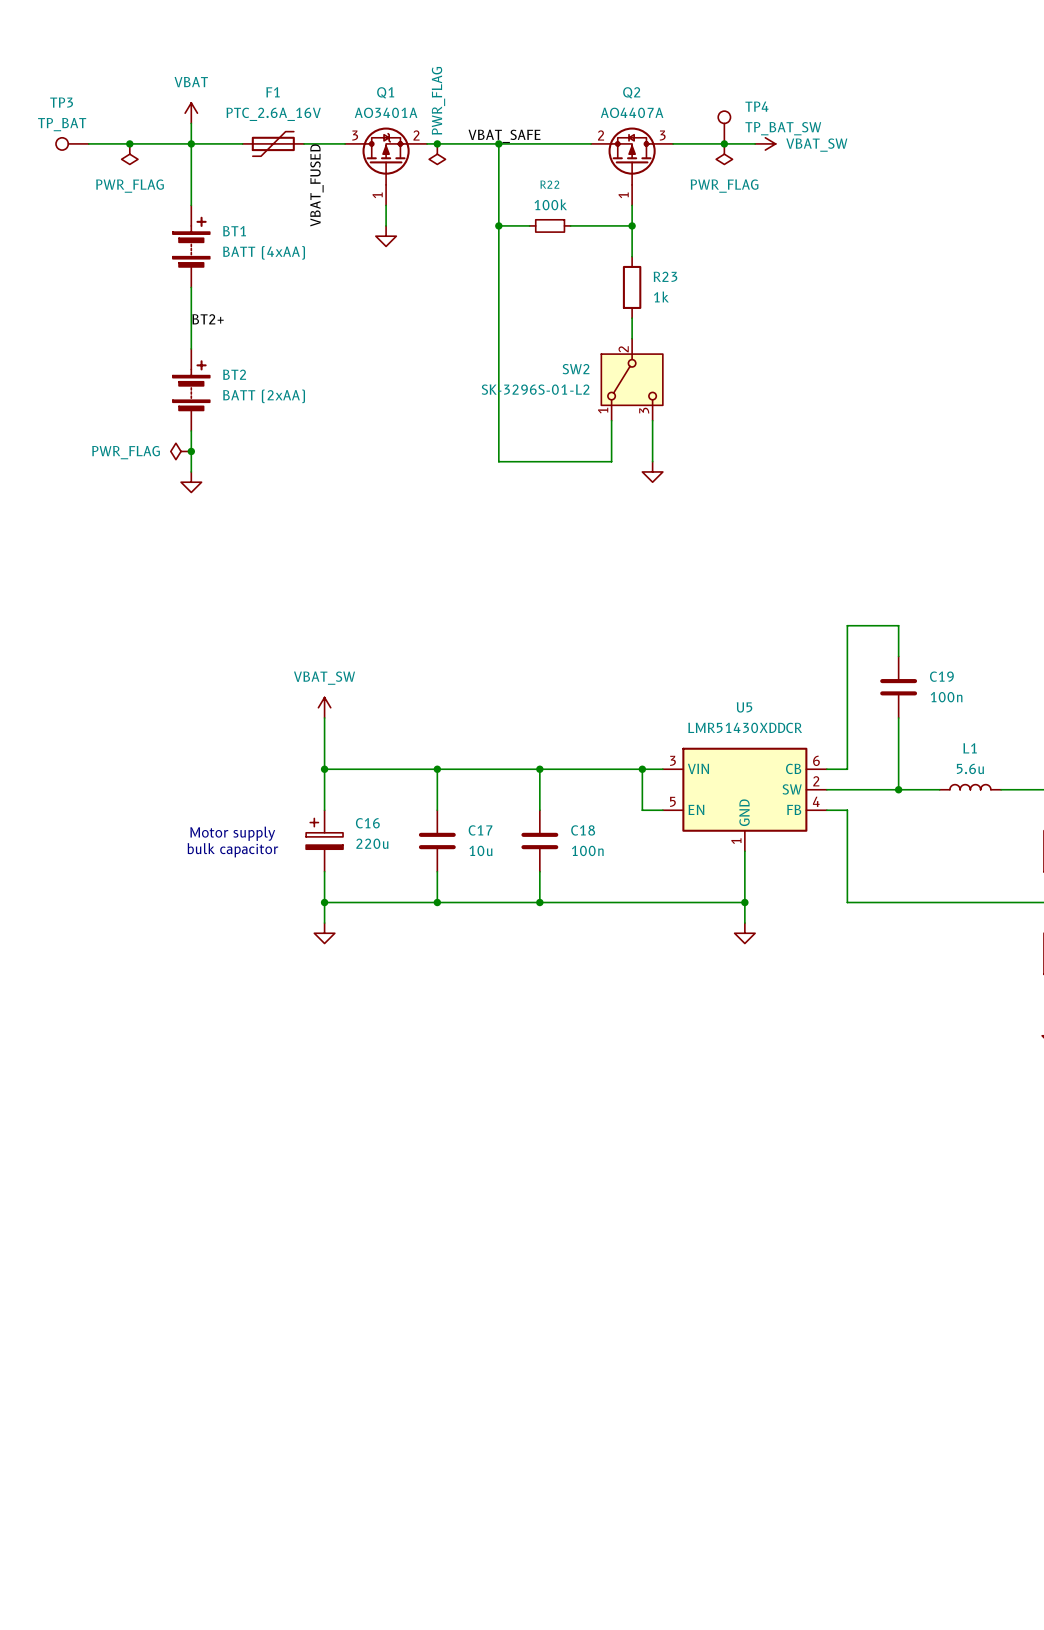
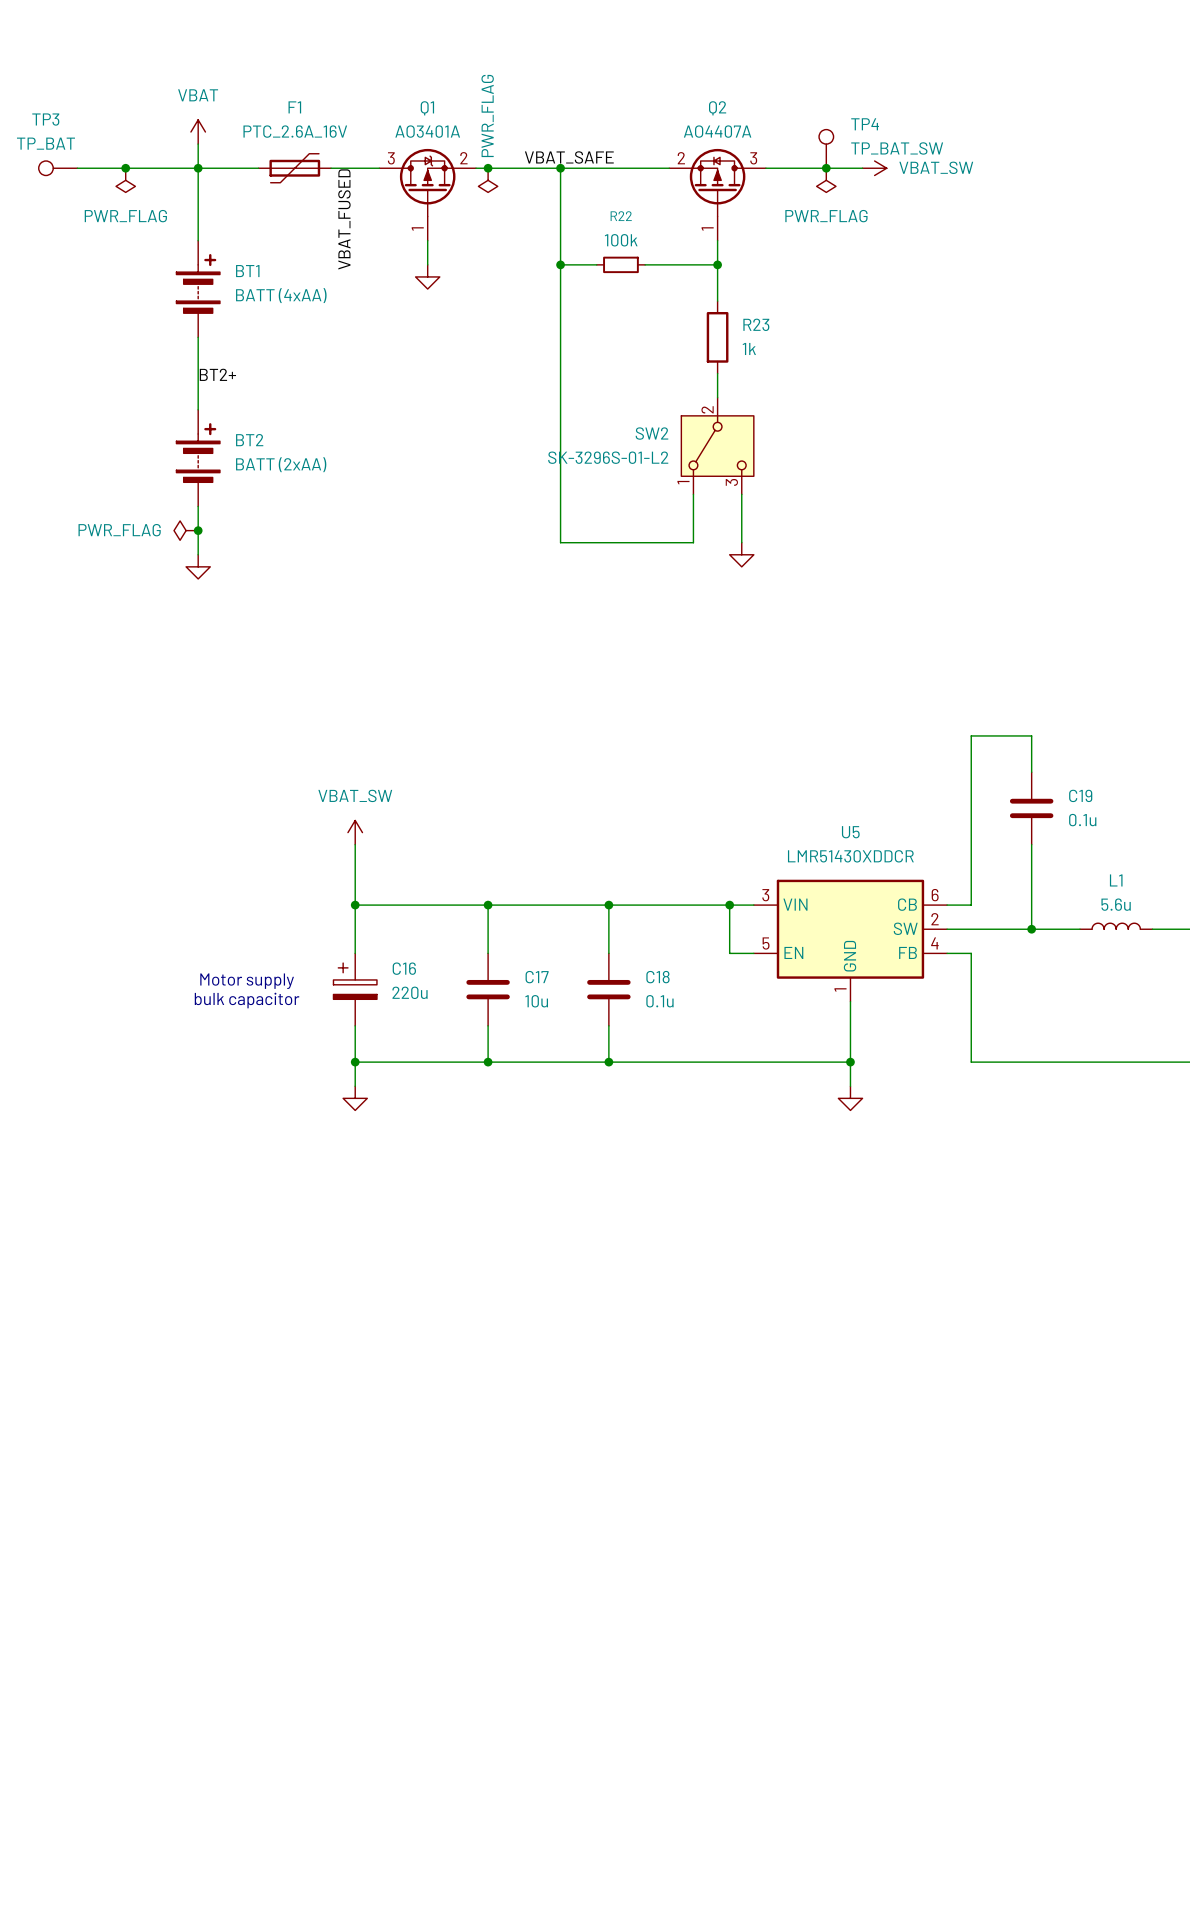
C19 value: 100n (946, 697) -> 0.1u (1082, 820)
C18 value: 100n (587, 850) -> 0.1u (659, 1001)

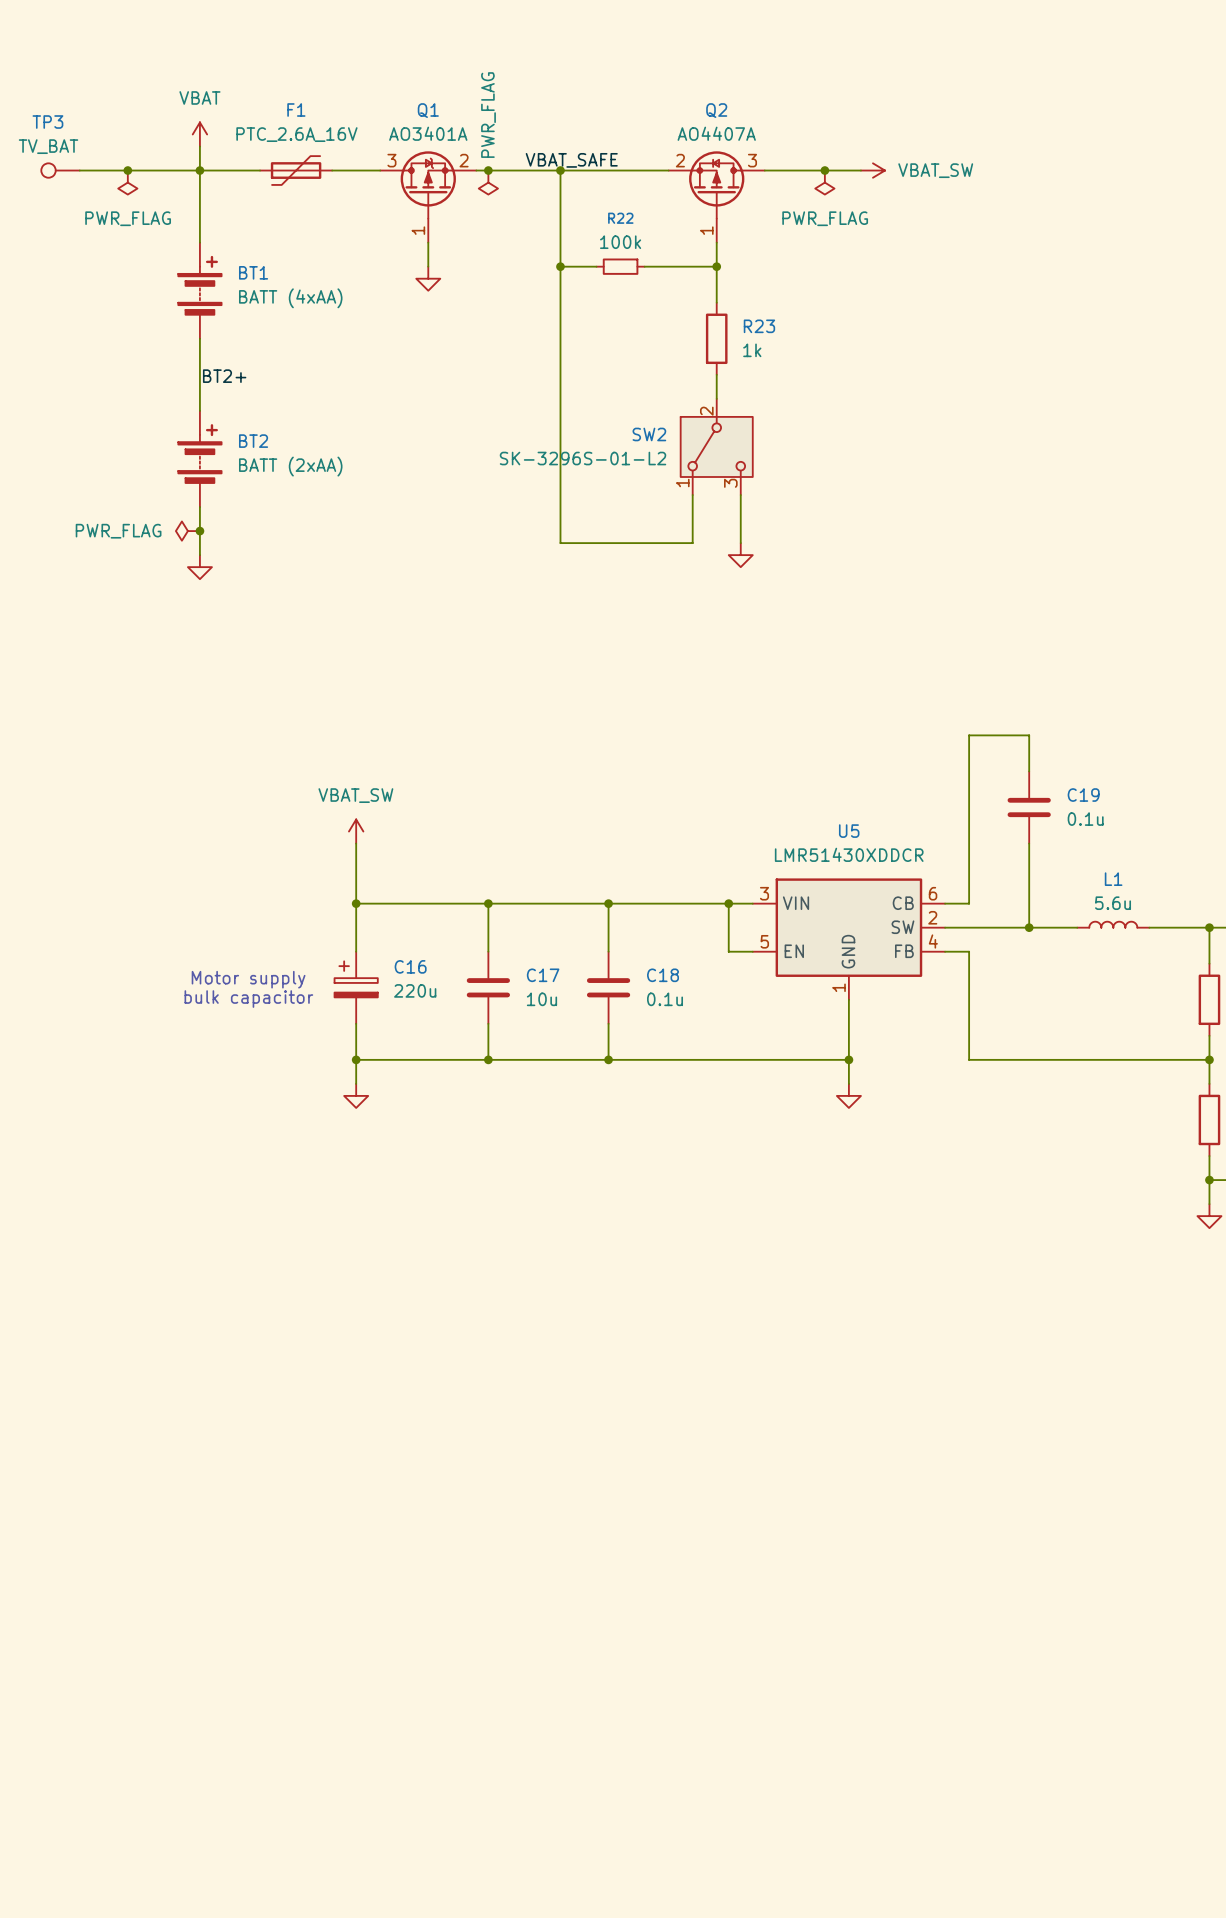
TP3 value: TP_BAT (45, 143) -> TV_BAT (48, 146)
TP4: TP_BAT_SW (826, 148) -> none
label: VBAT_FUSED (344, 219) -> none

